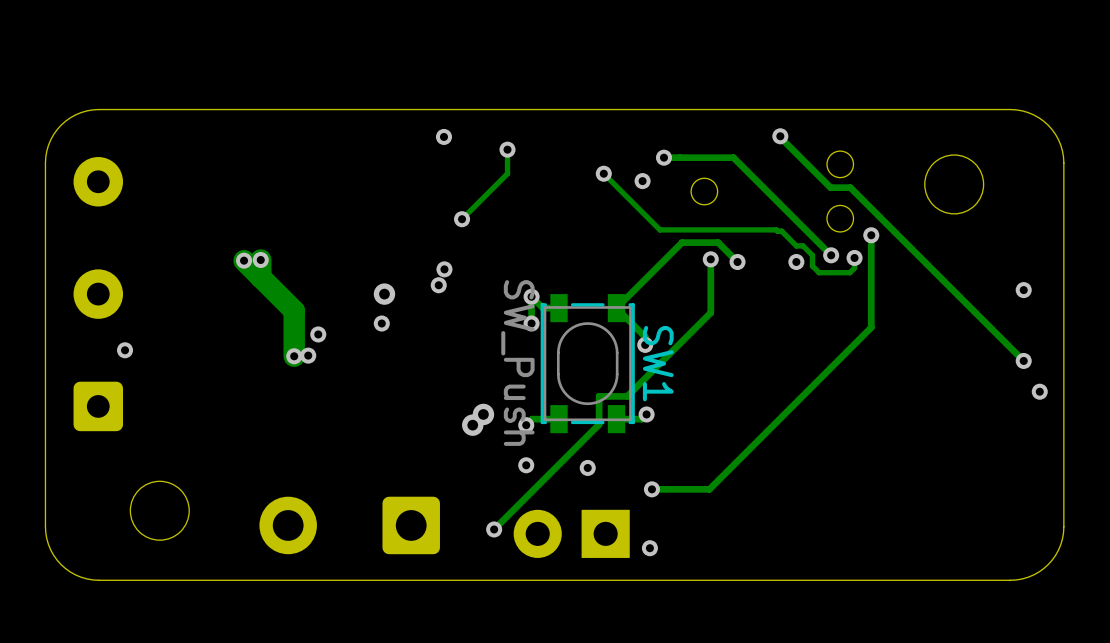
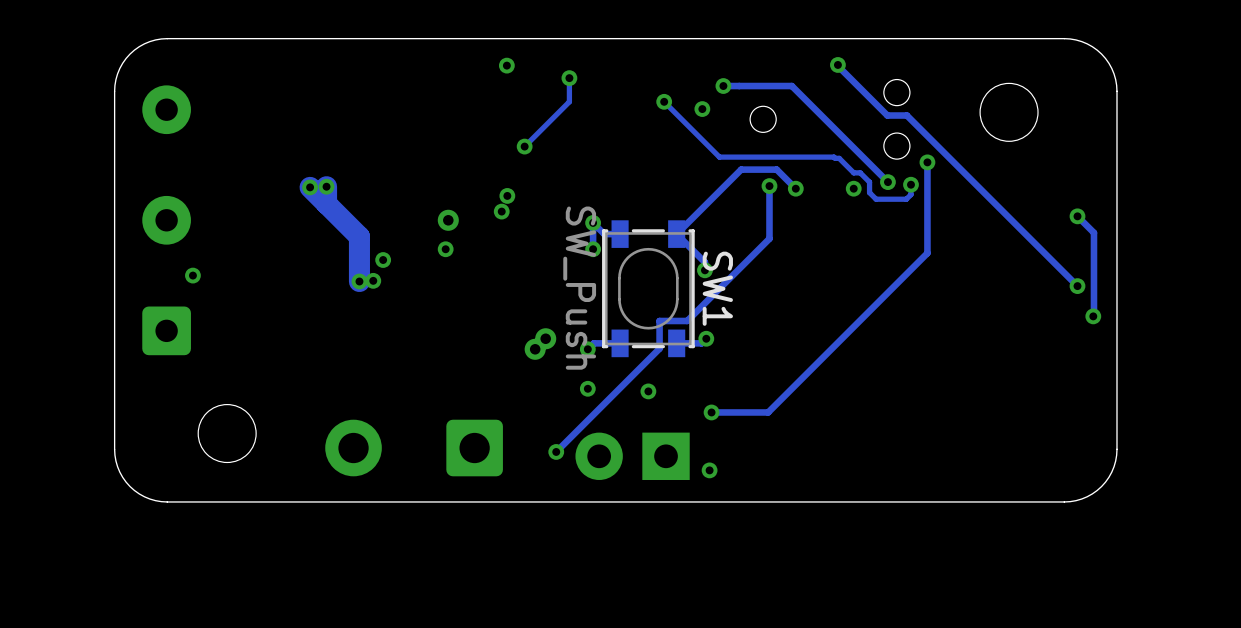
track: none -> (1077, 216) (1093, 232) (1093, 315)

